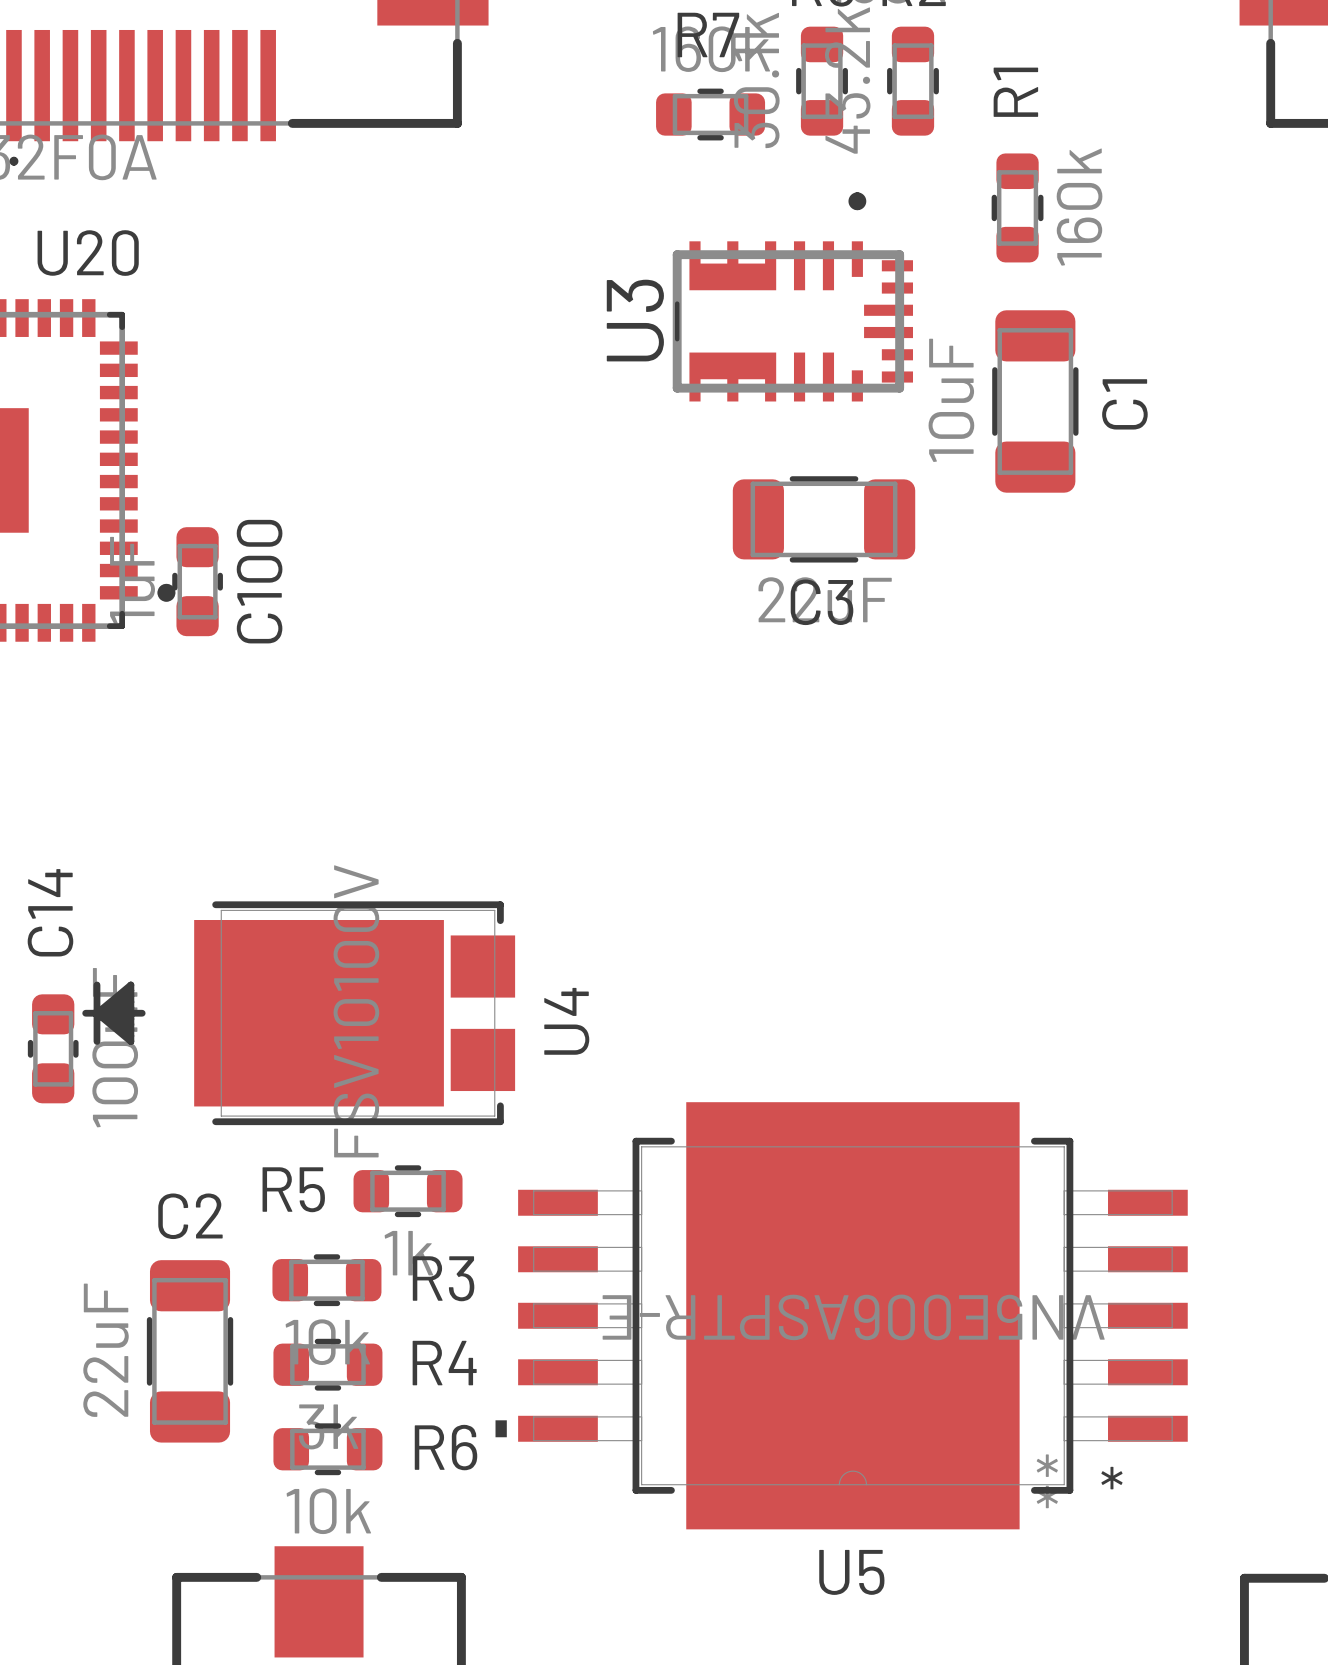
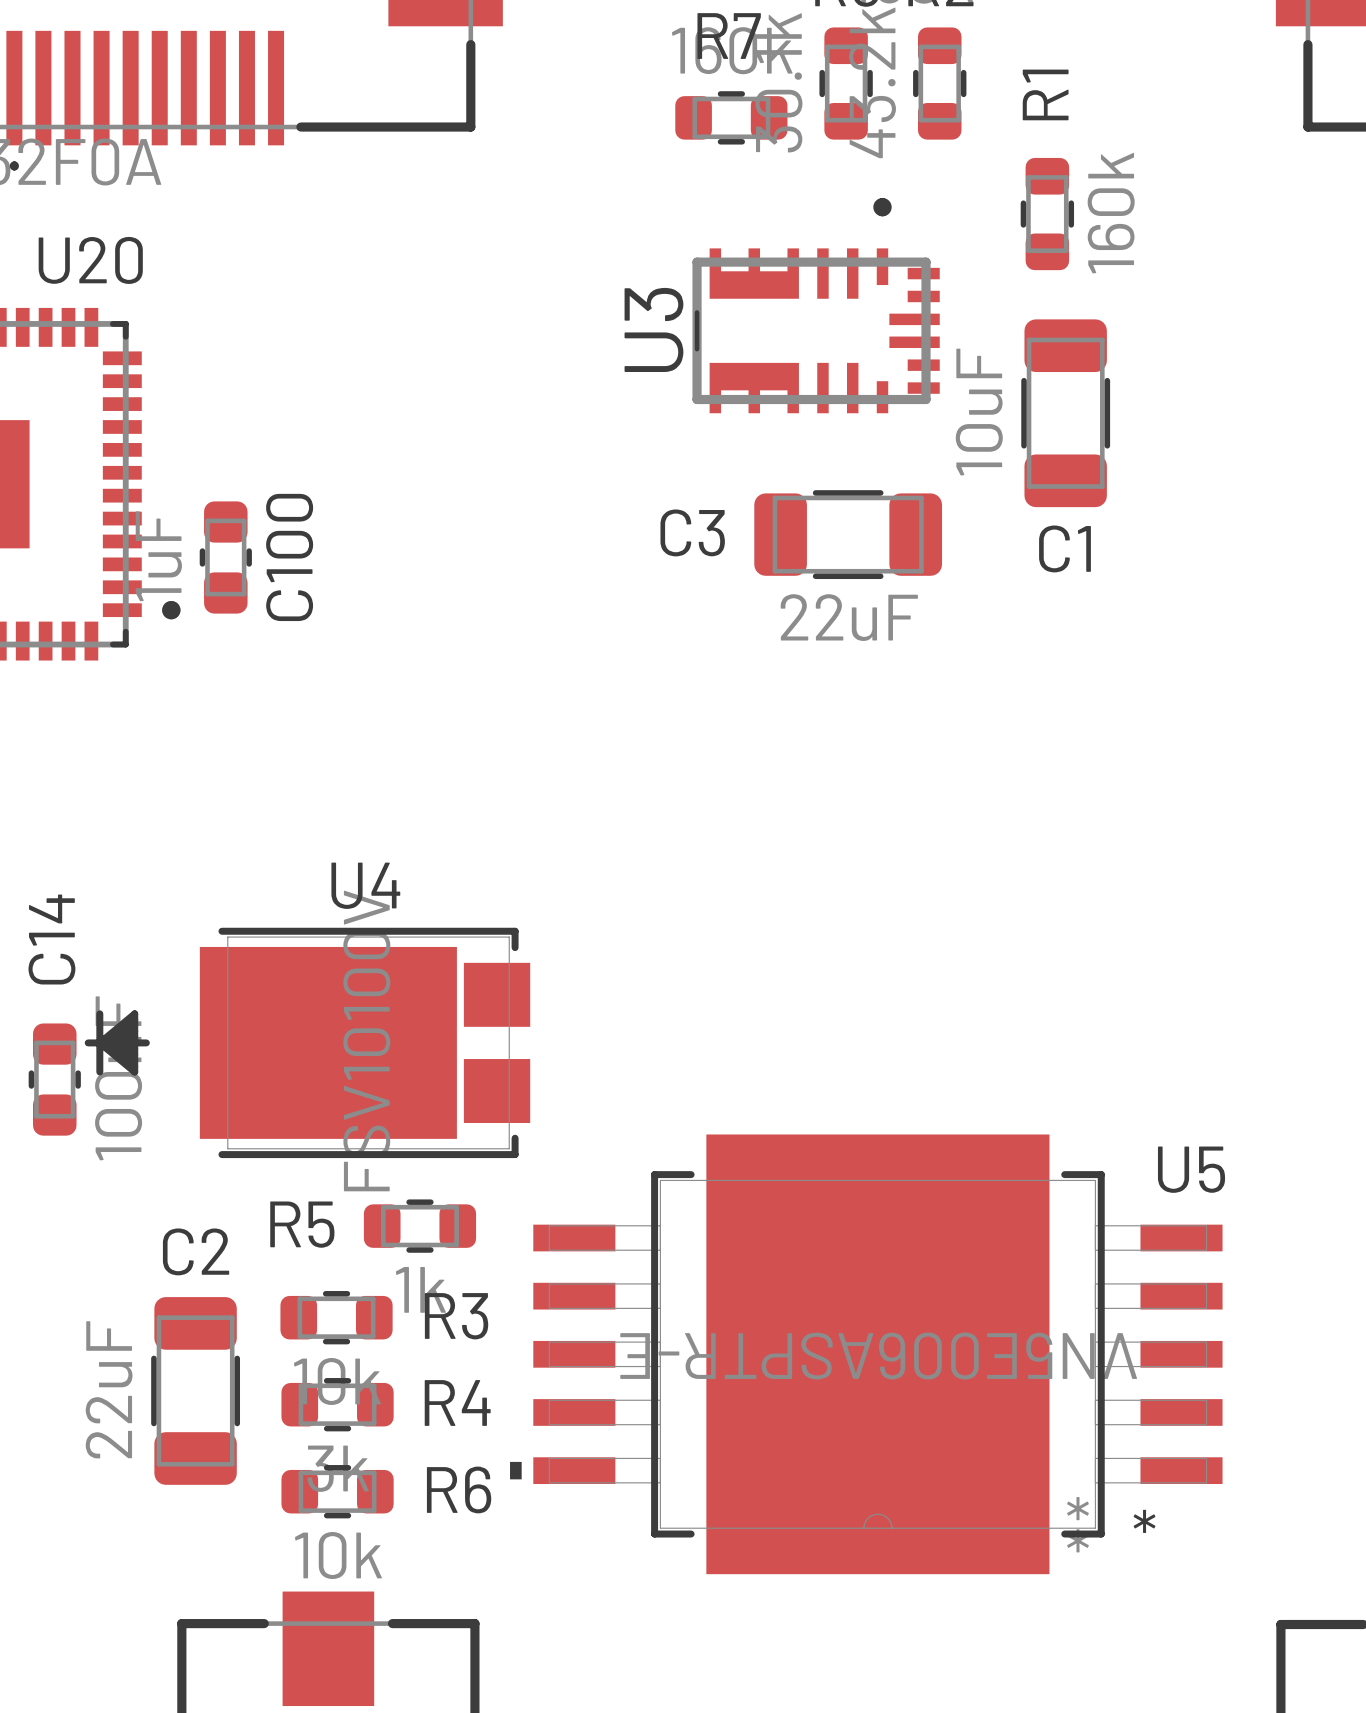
C1 name rotation: 0° (1124, 404) -> 90° clockwise (1064, 548)
C1 name position: C1 (1124, 404) -> C1 (1064, 548)
C100 position: (197, 581) -> (225, 557)
C3 name position: C3 (822, 602) -> C3 (692, 532)
U4 name rotation: 0° (566, 1021) -> 90° clockwise (365, 885)
U4 name position: U4 (566, 1021) -> U4 (365, 885)
U5 name position: U5 (851, 1572) -> U5 (1191, 1169)

